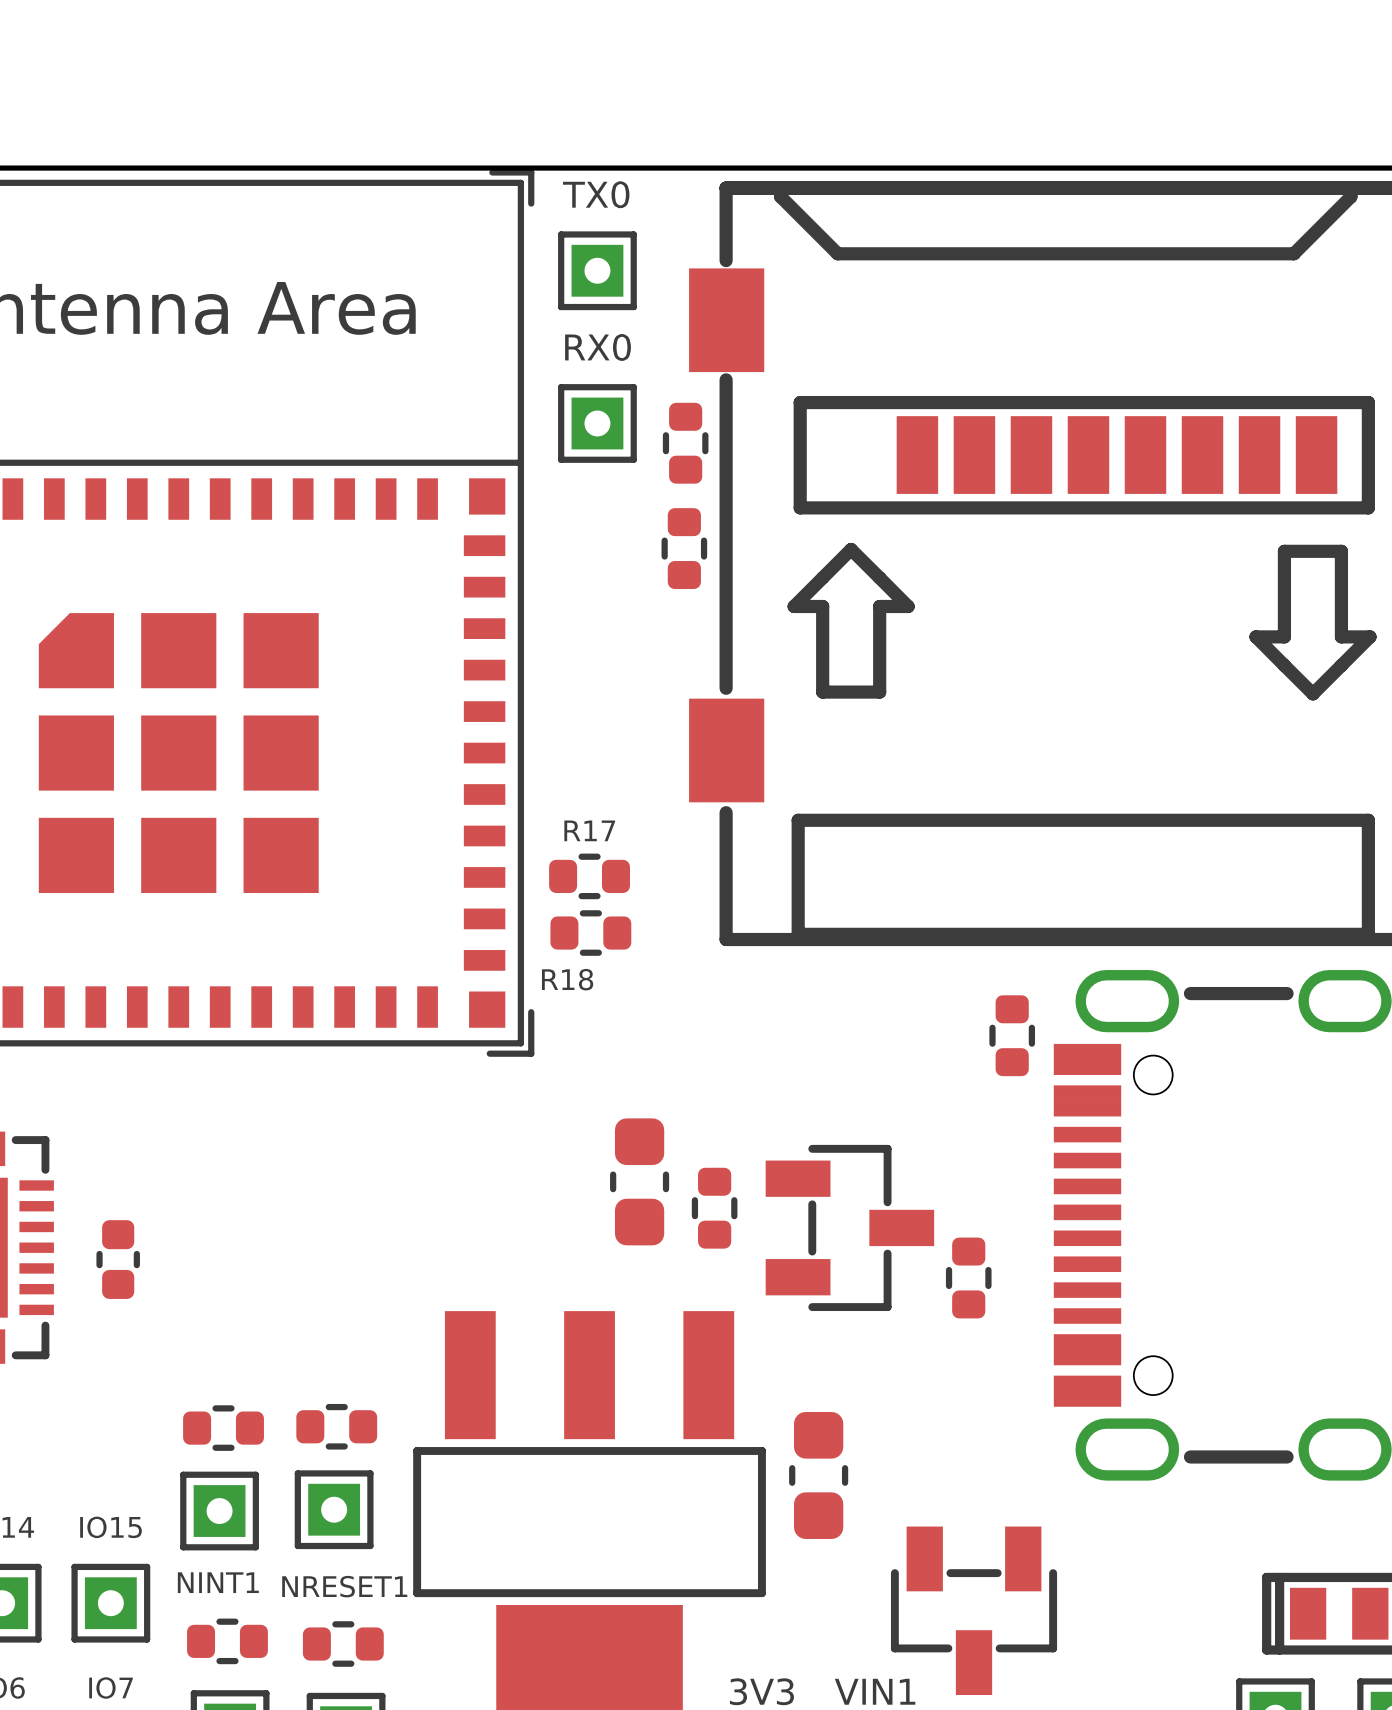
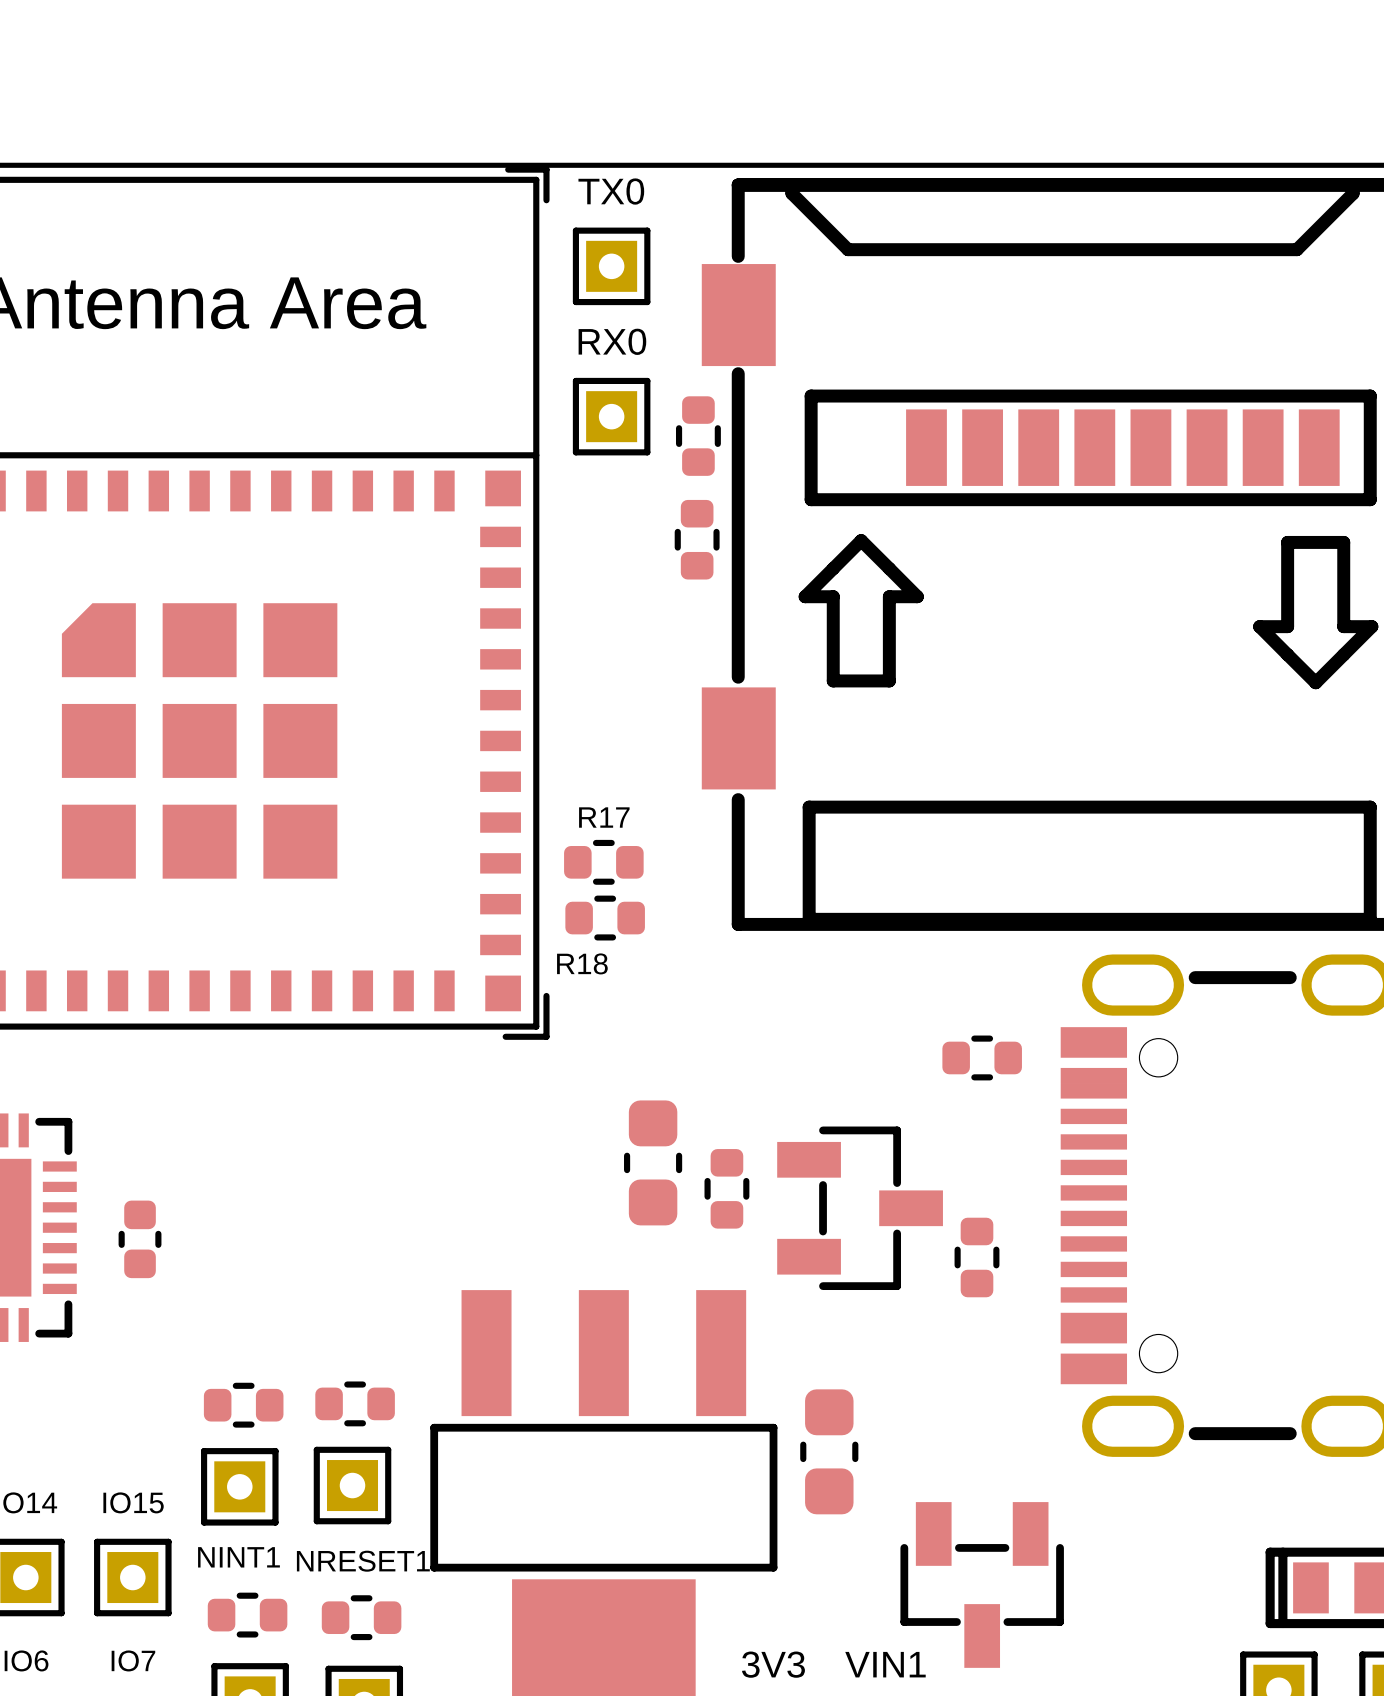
part rotation: 0° (1012, 1035) -> 90° clockwise (982, 1057)
part position: (1012, 1035) -> (982, 1057)

